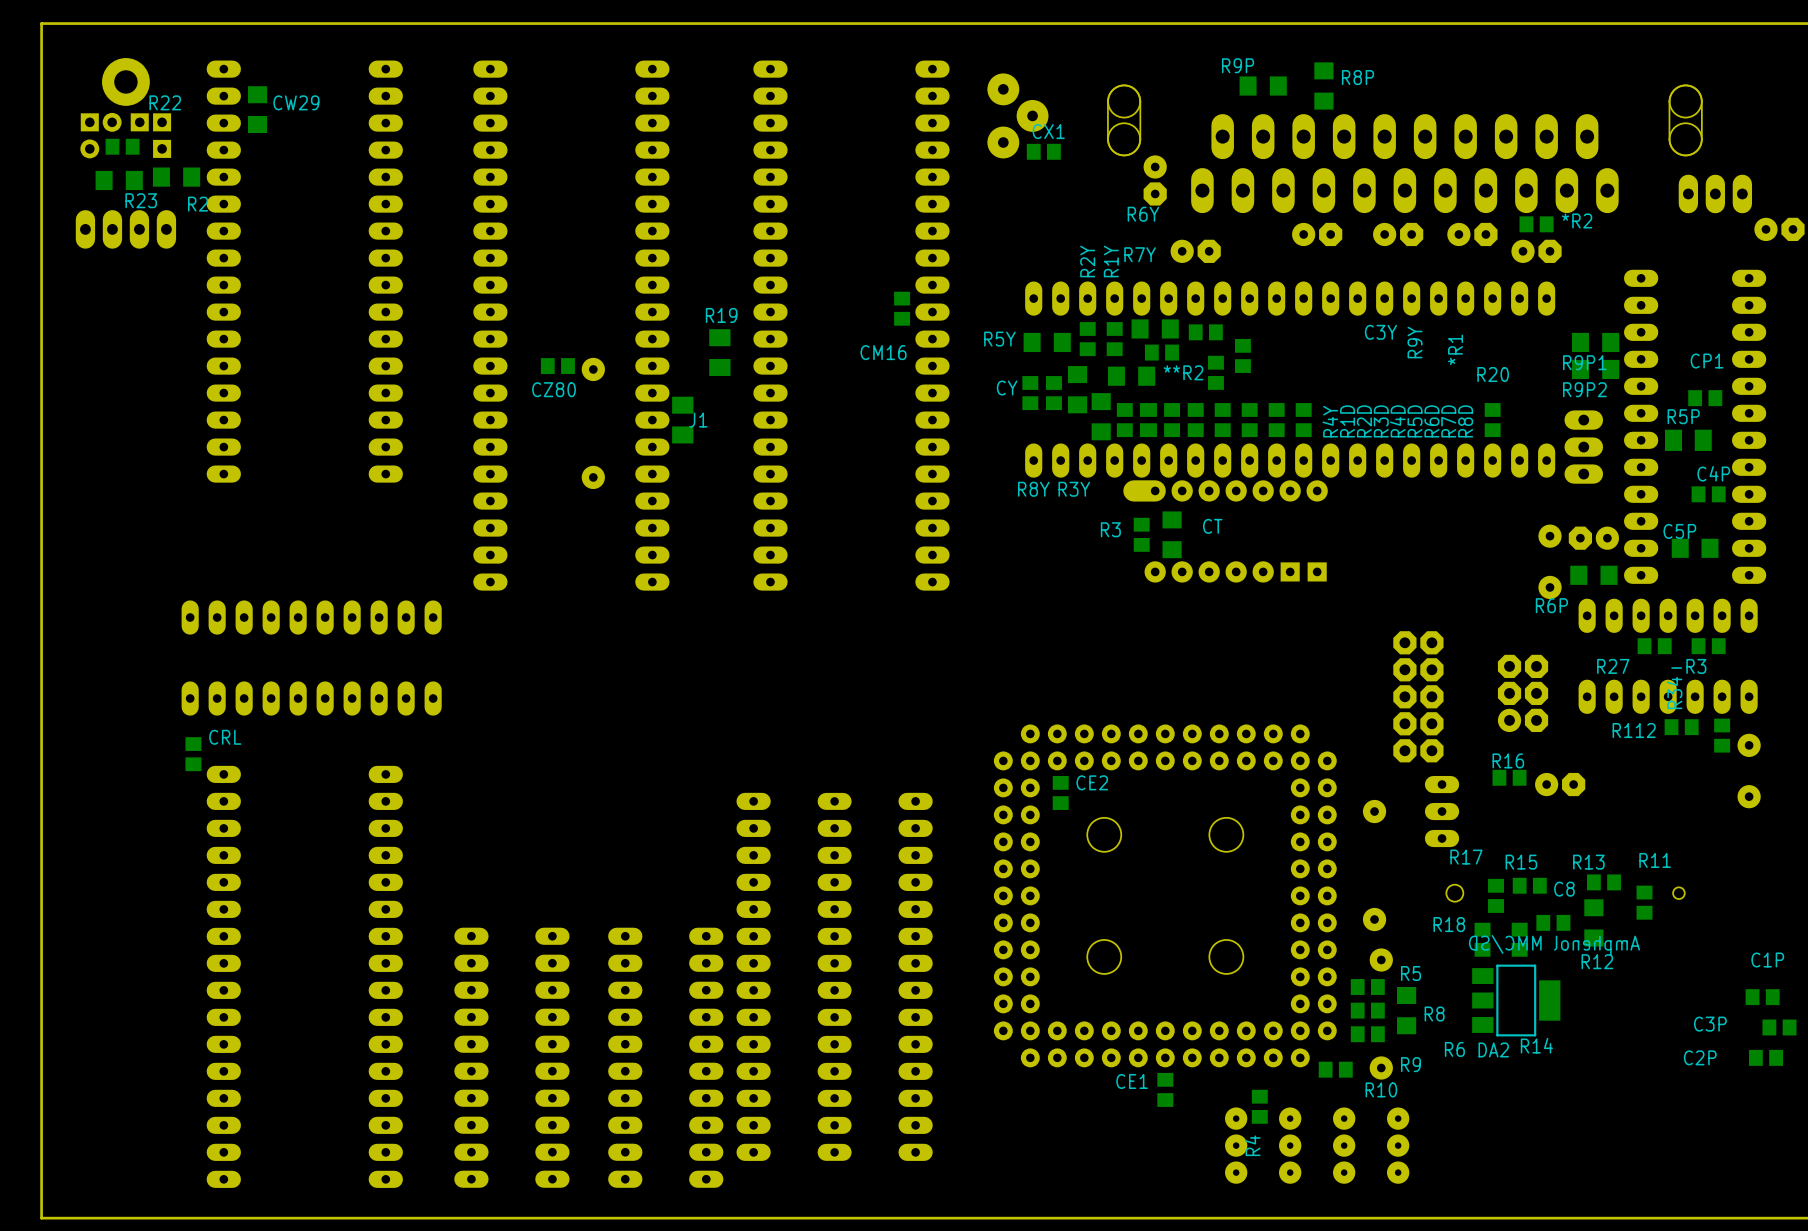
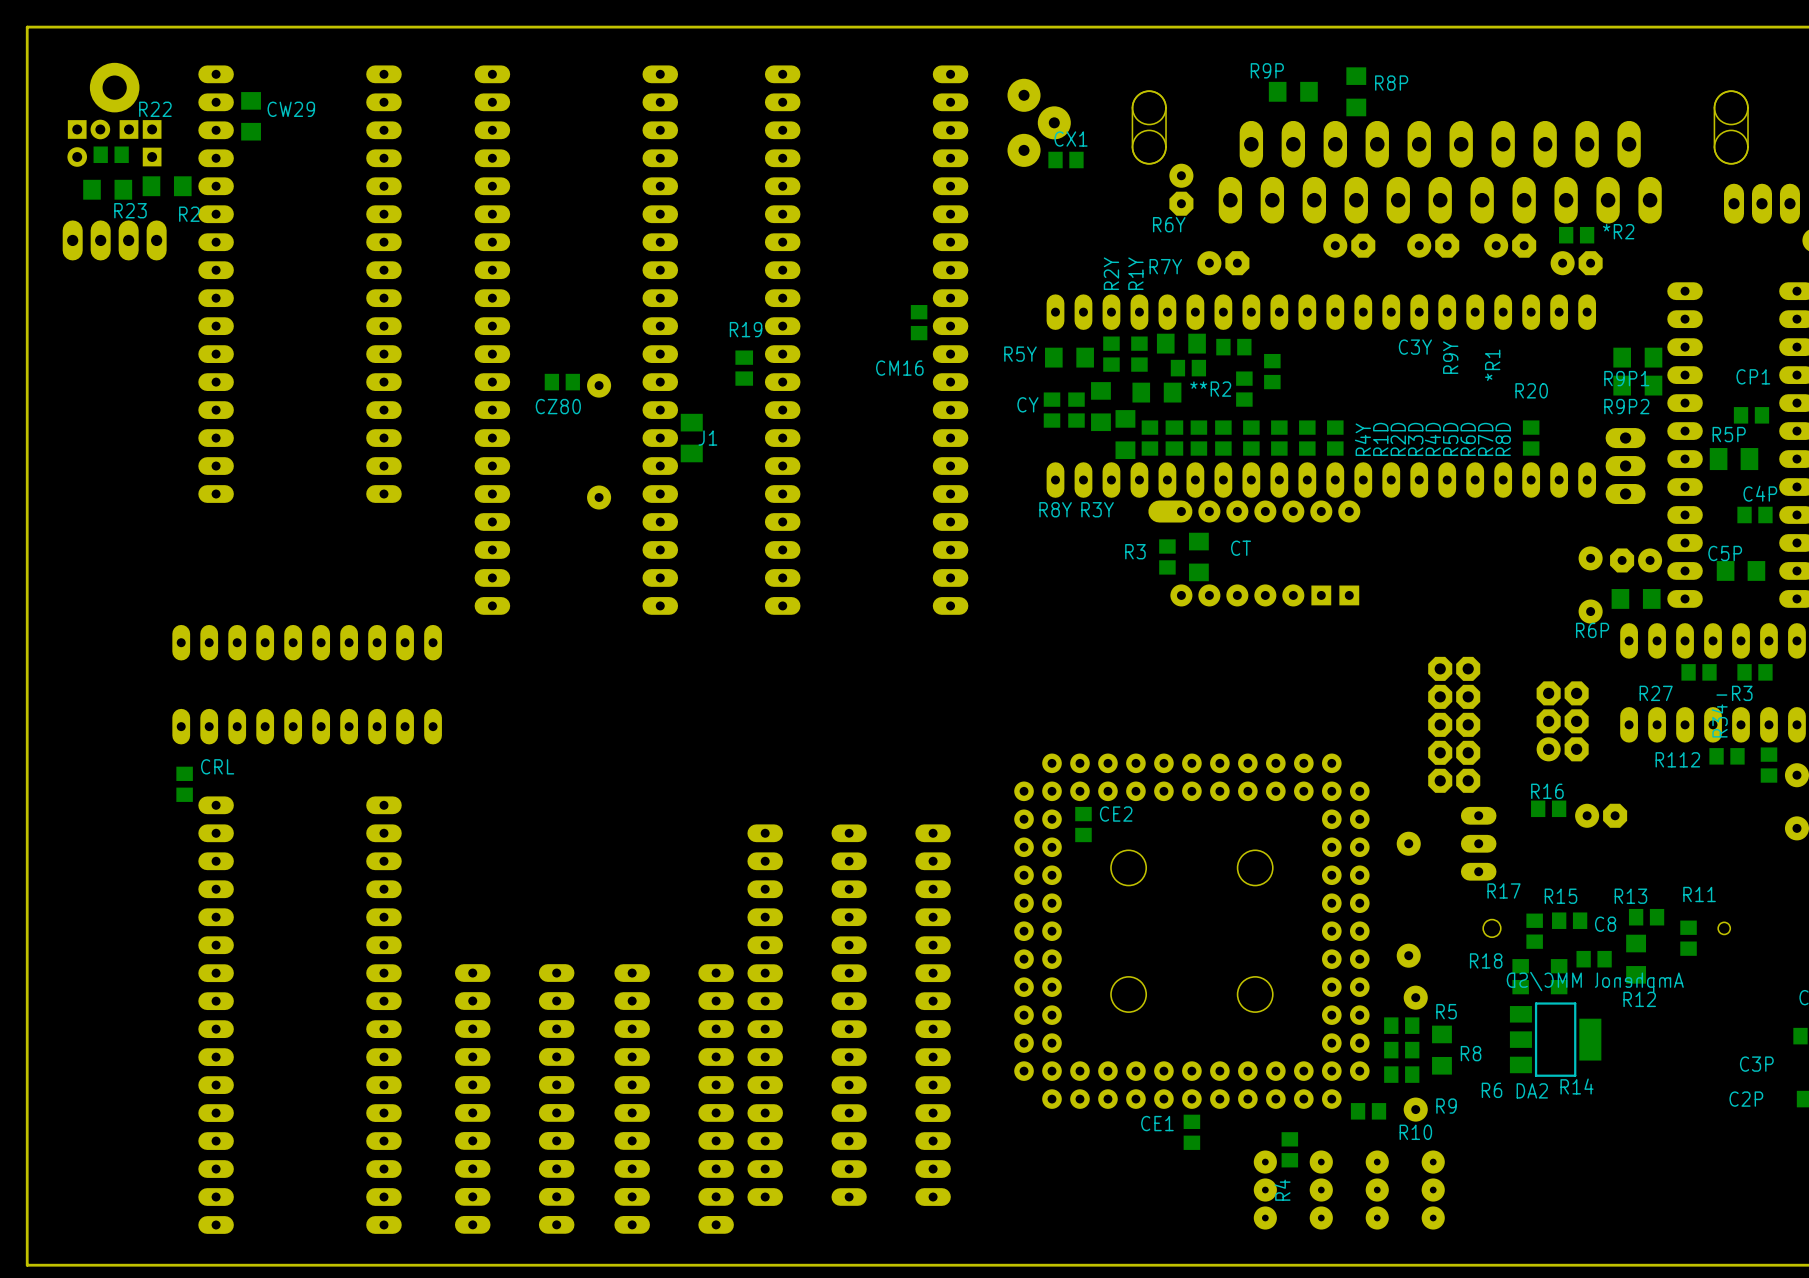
R19 footprint: [709, 329, 731, 376] -> [735, 350, 754, 386]

